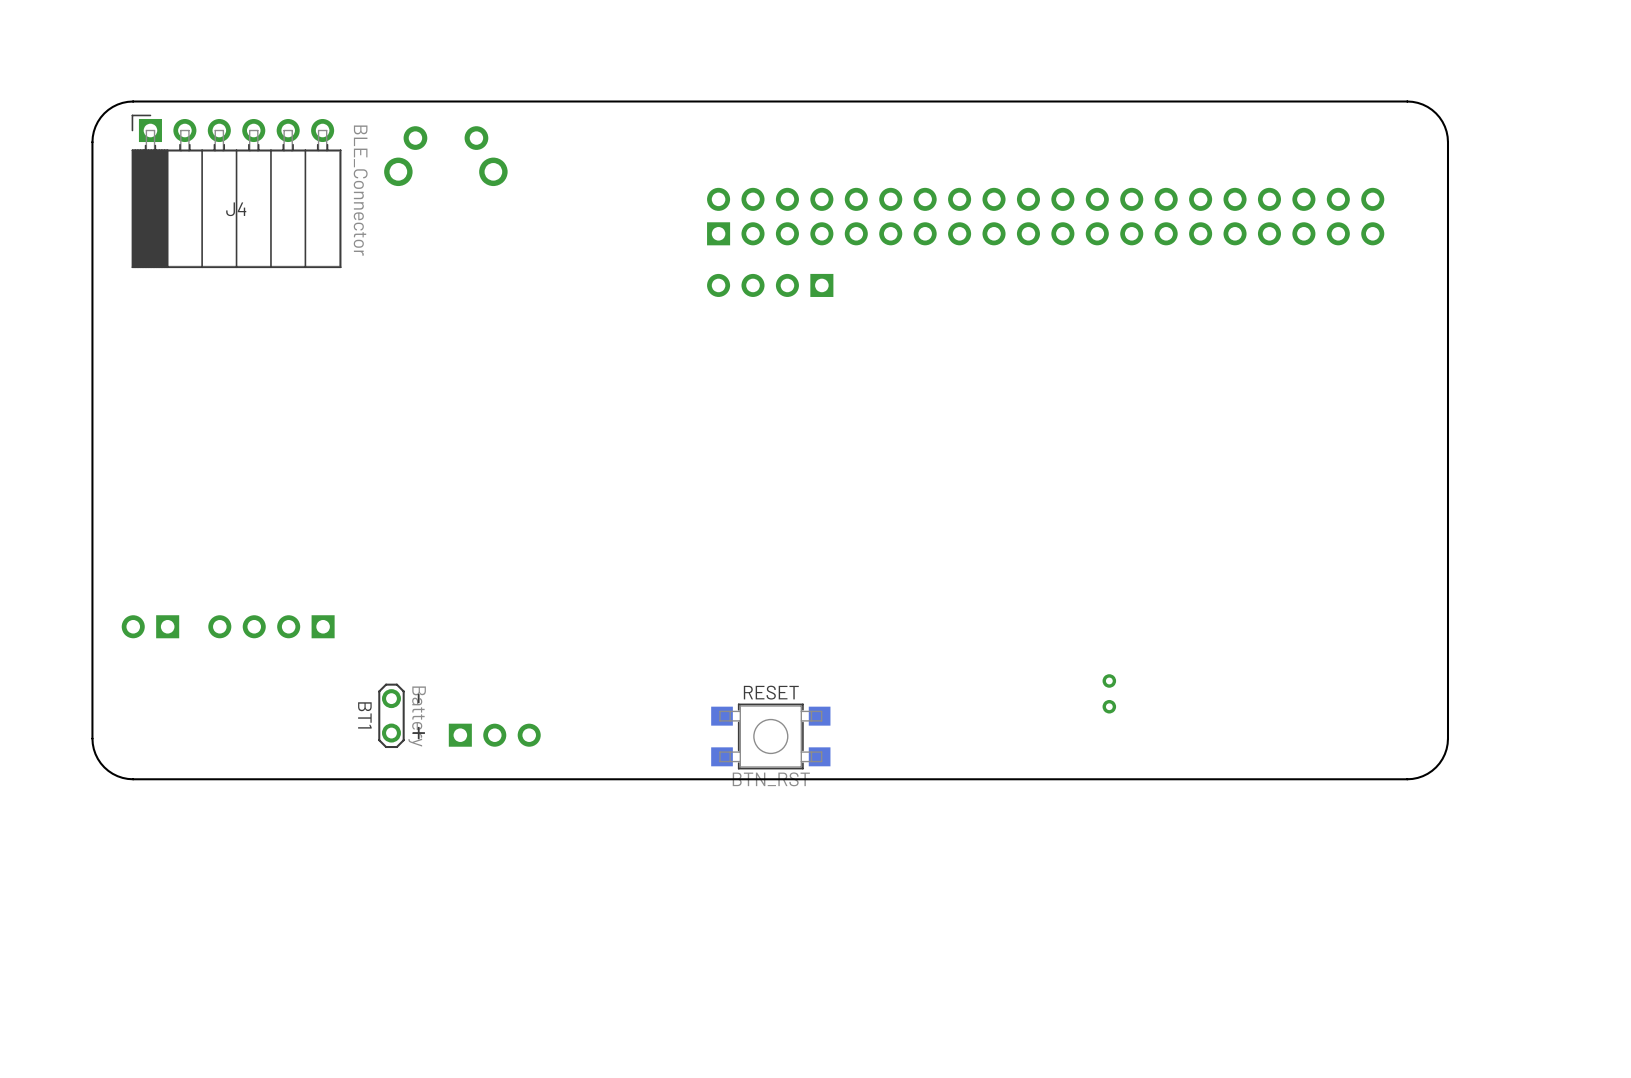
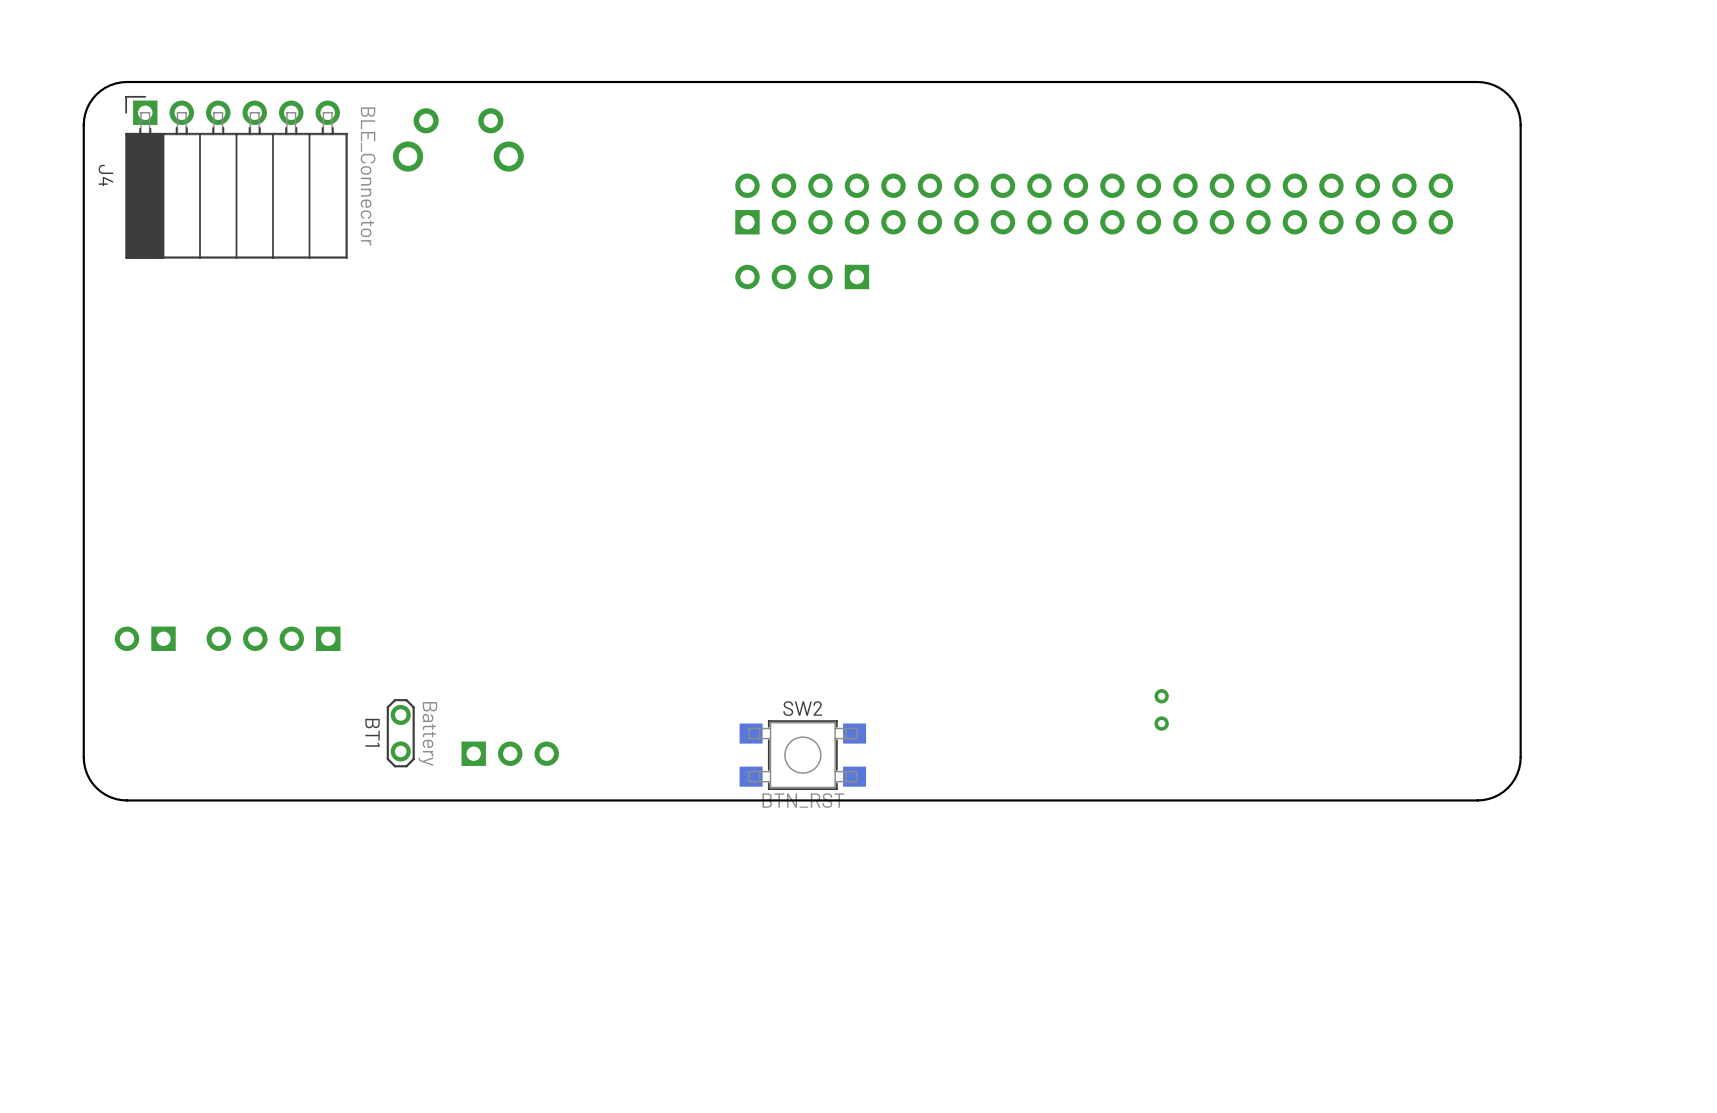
J4 name rotation: 0° (236, 209) -> 90° clockwise (105, 175)
J4 name position: J4 (236, 209) -> J4 (105, 175)
RESET name: RESET (771, 692) -> SW2 (802, 708)
text: - (418, 698) -> none
text: + (418, 733) -> none

